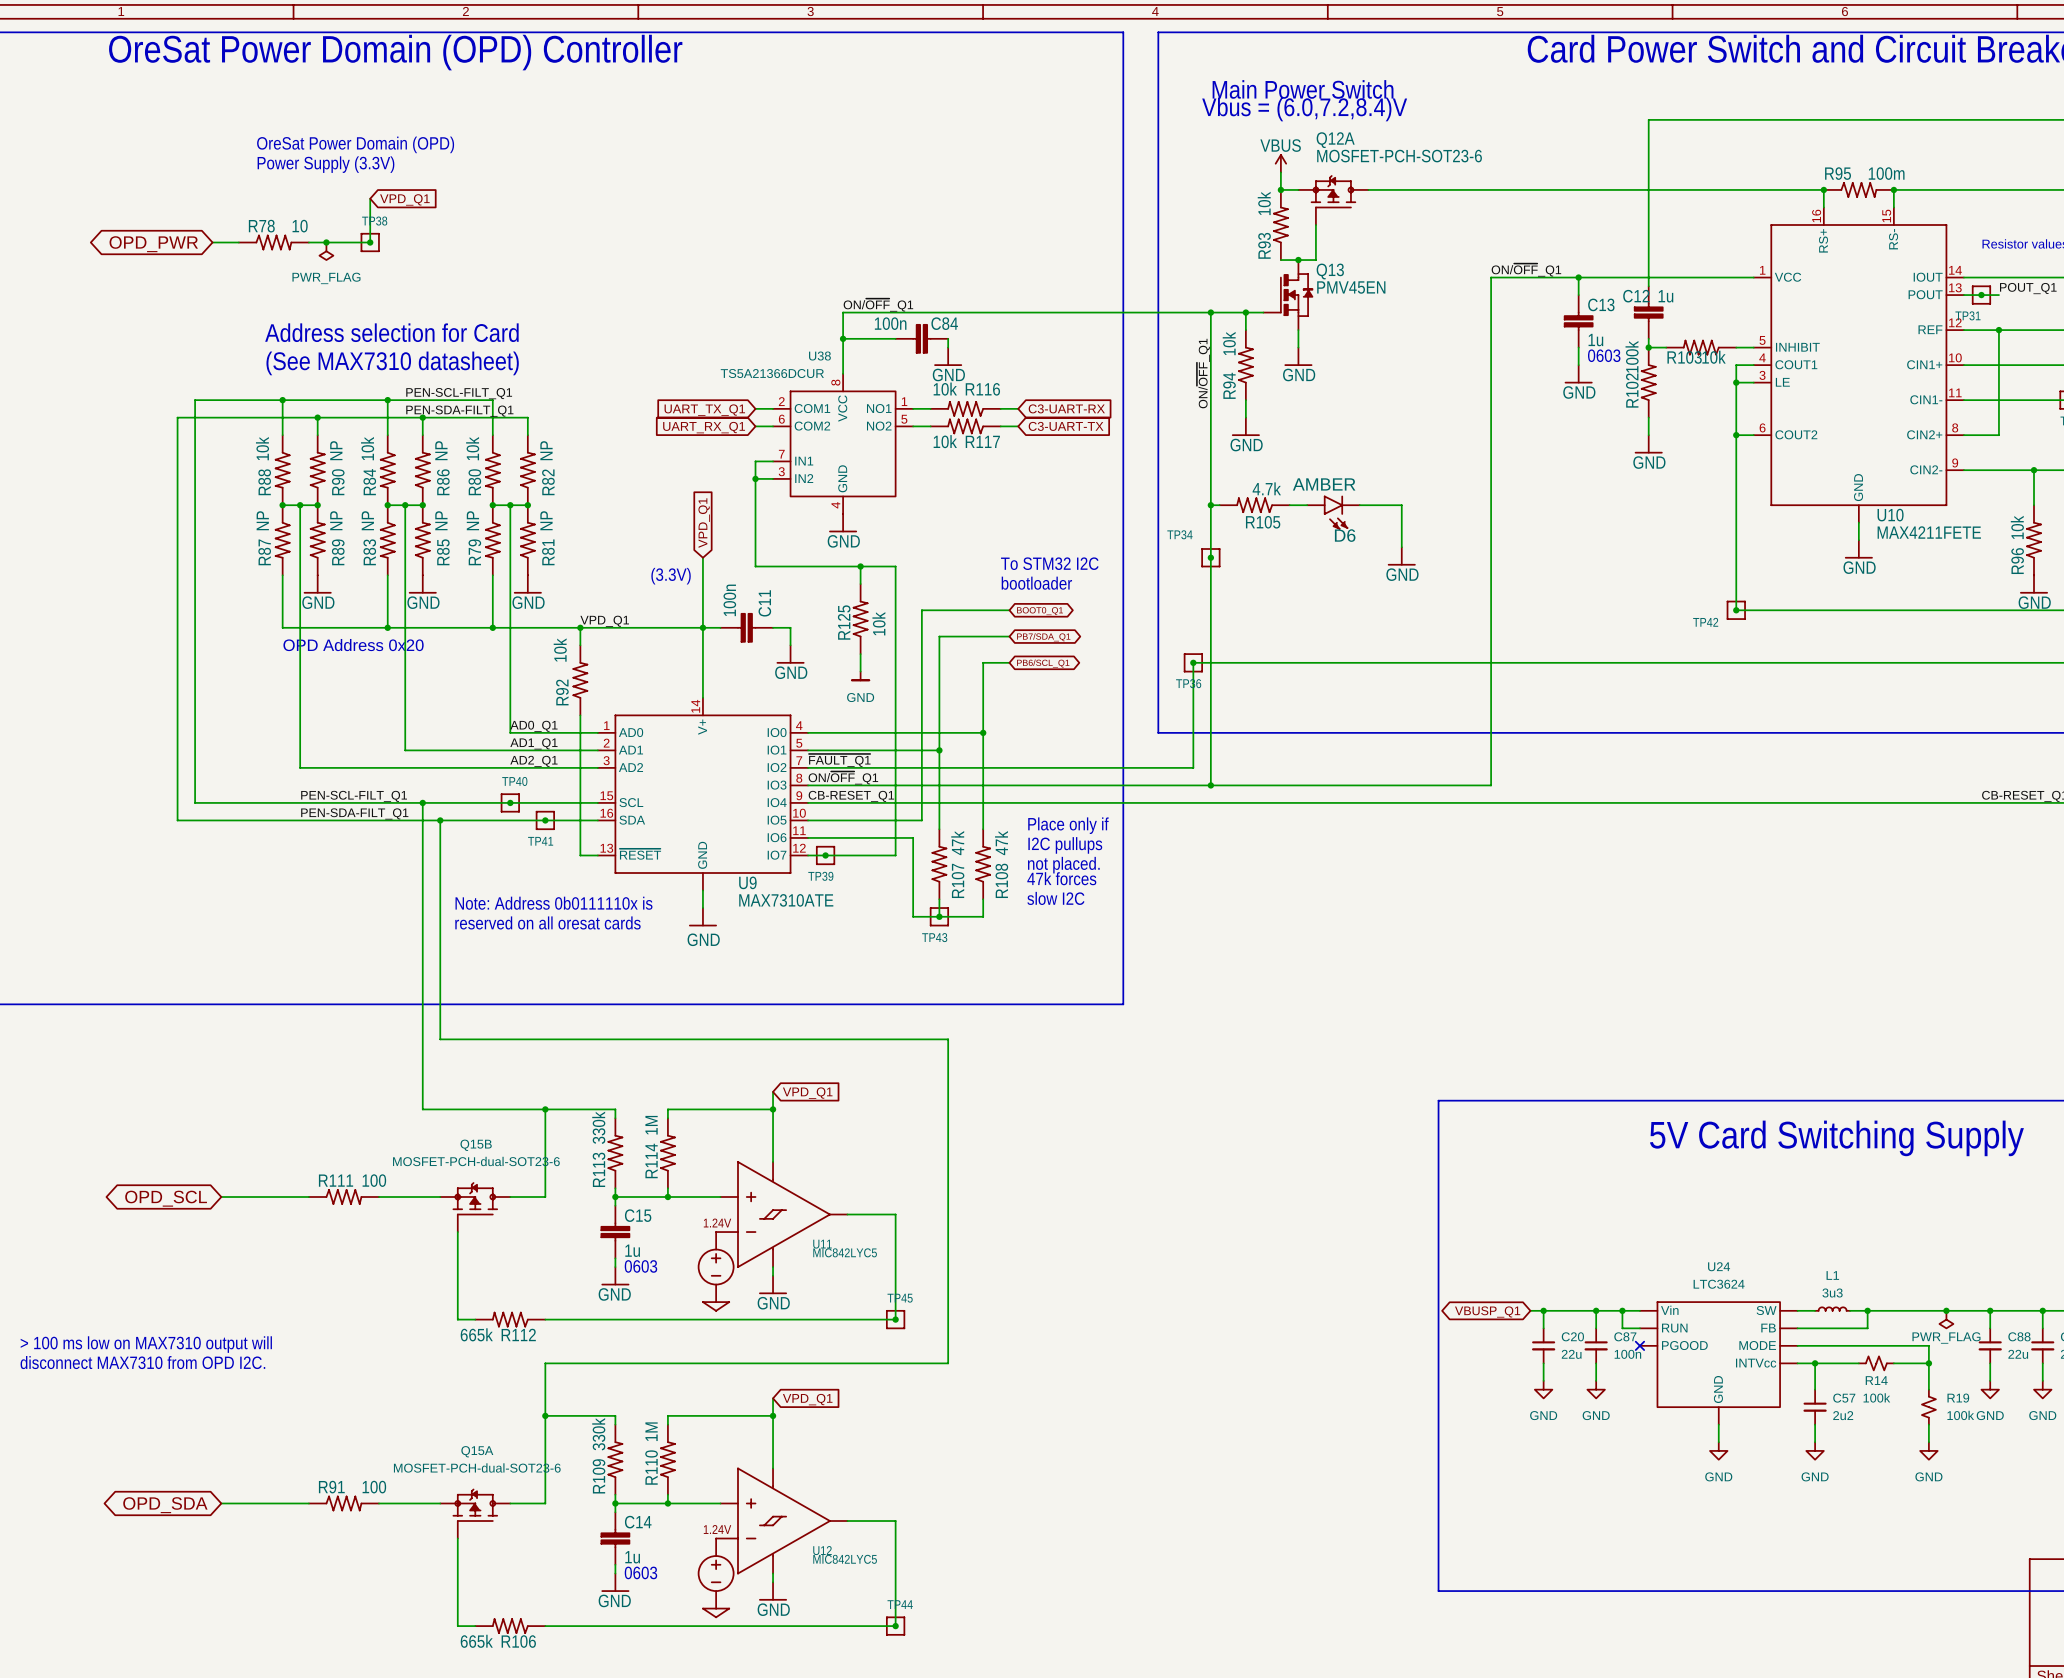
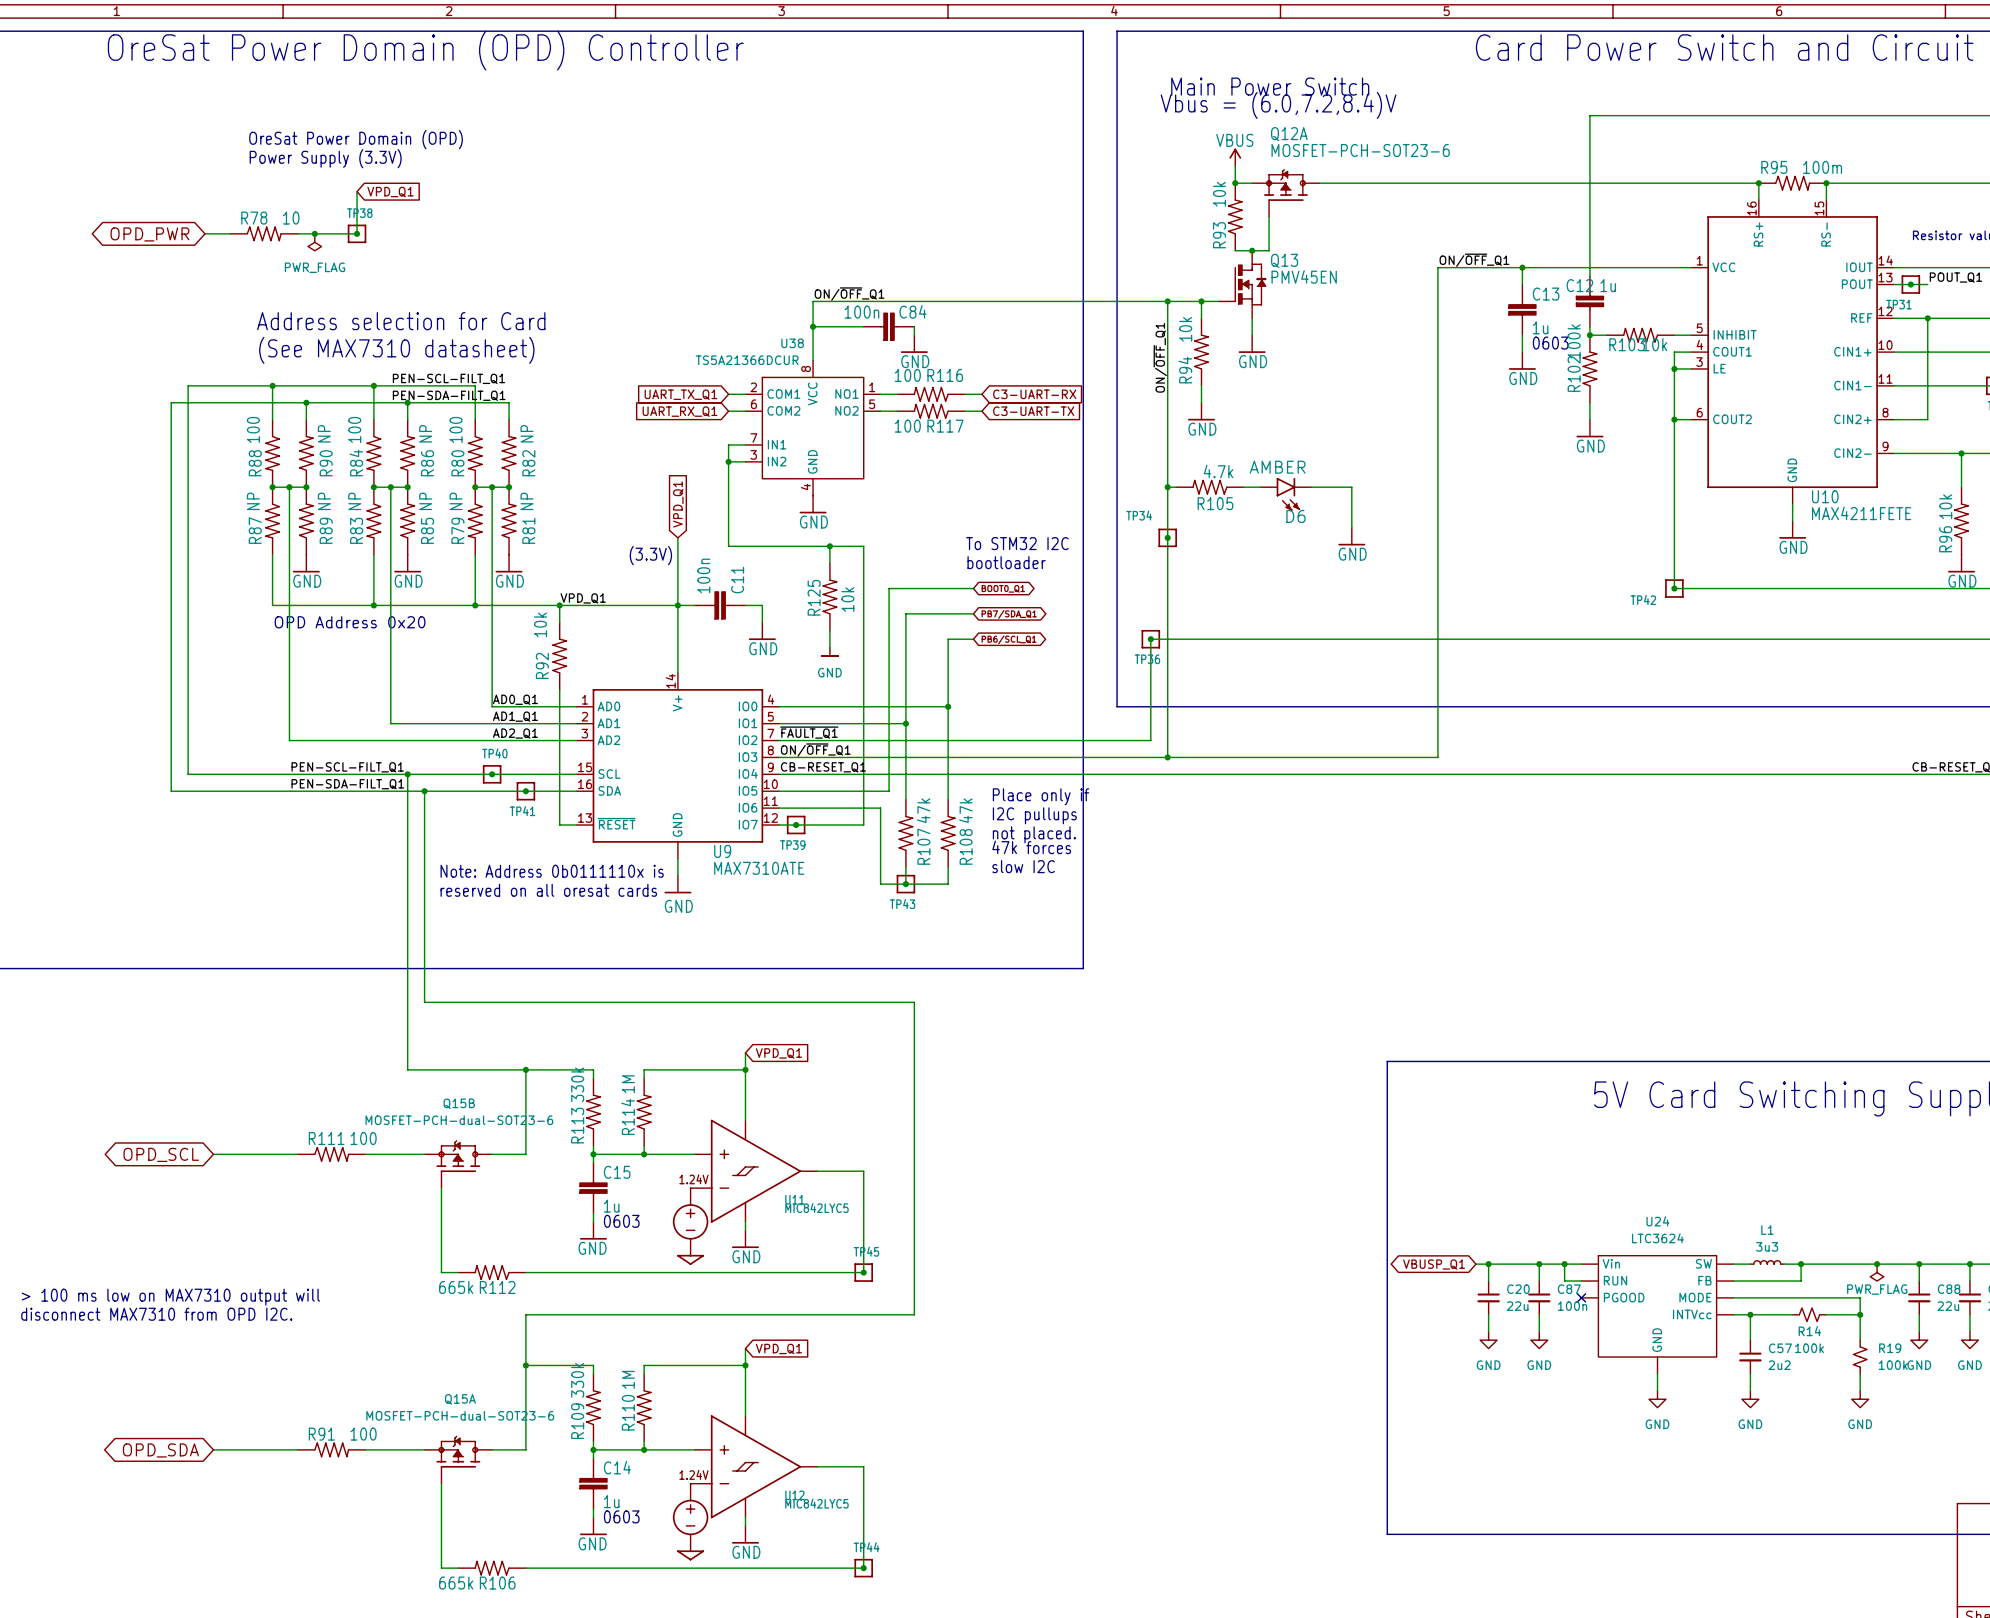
R116 value: 10k (945, 389) -> 100 (907, 375)
R117 value: 10k (945, 441) -> 100 (907, 426)
R88 value: 10k (262, 448) -> 100 (253, 429)
R84 value: 10k (367, 448) -> 100 (354, 429)
R80 value: 10k (472, 448) -> 100 (456, 429)

